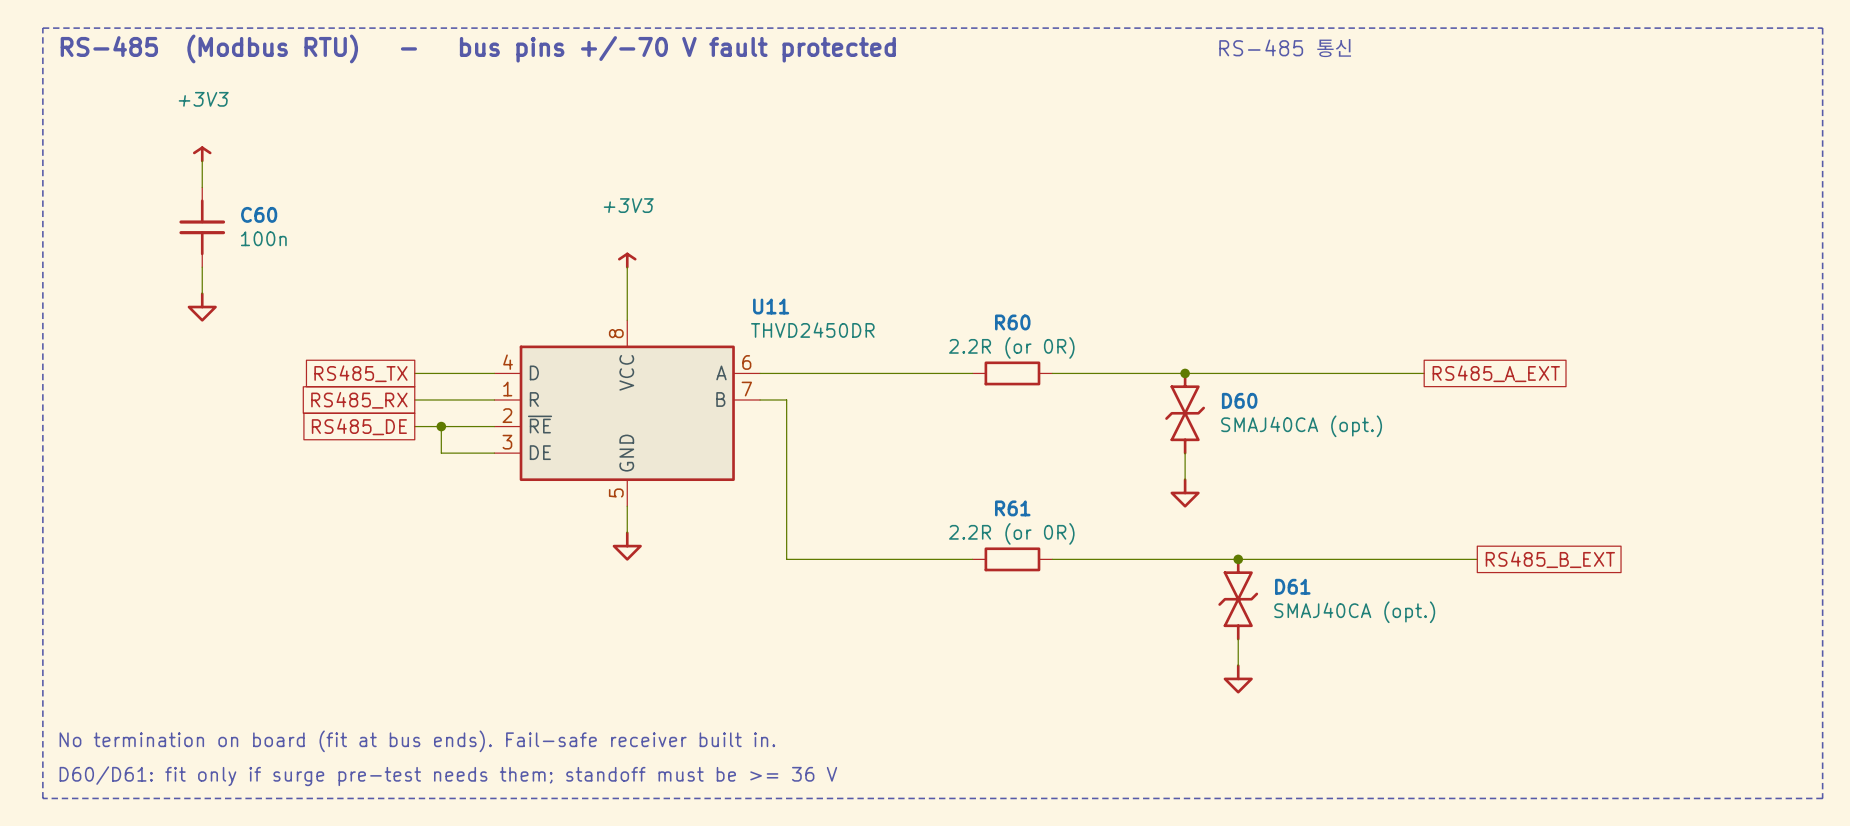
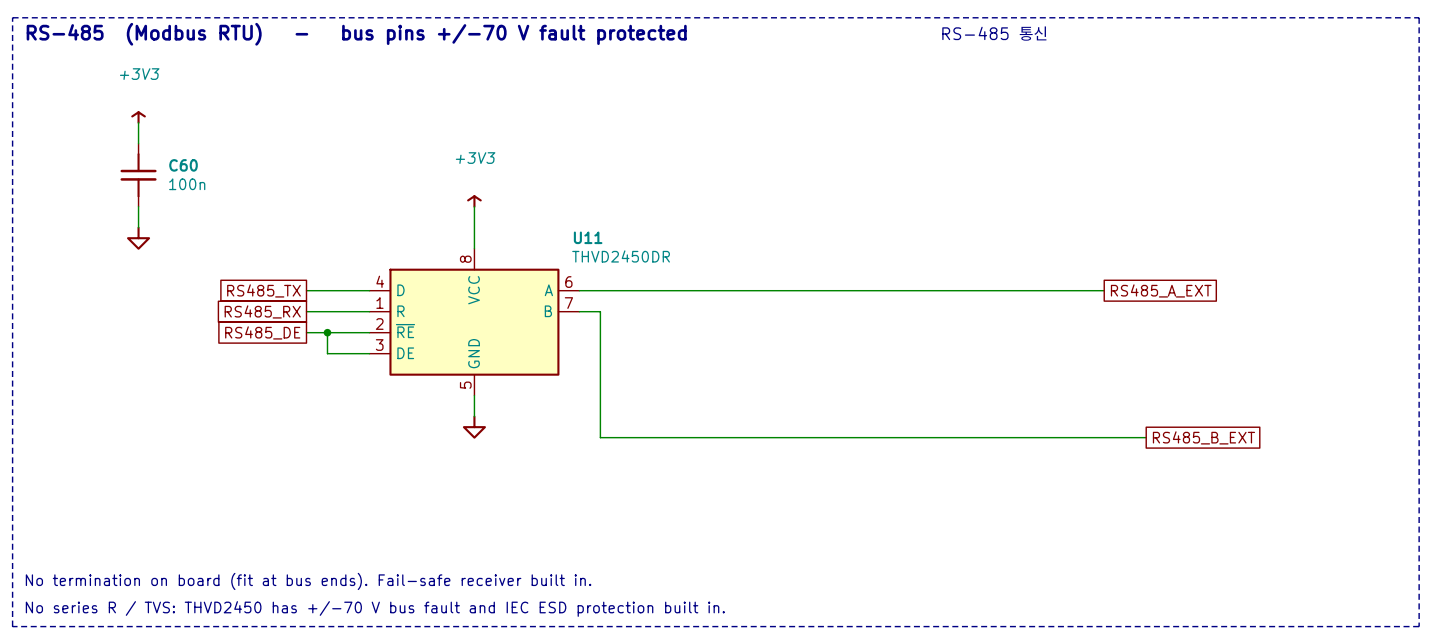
wire: none -> (747, 290) (810, 290)
R60: 2.2R (or 0R) (1012, 373) -> none
junction: (1185, 373) -> none
D60: SMAJ40CA (opt.) (1185, 413) -> none
wire: (1185, 453) (1185, 479) -> none
power symbol: (1185, 492) -> none
wire: none -> (747, 437) (810, 437)
R61: 2.2R (or 0R) (1012, 559) -> none
junction: (1238, 559) -> none
D61: SMAJ40CA (opt.) (1238, 599) -> none
wire: (1238, 639) (1238, 665) -> none
power symbol: (1238, 678) -> none
text: D60/D61: fit only if surge pre-test needs them; standoff must be >= 36 V (448, 776) -> No series R / TVS: THVD2450 has +/-70 V bus fault and IEC ESD protection built in. (375, 608)

